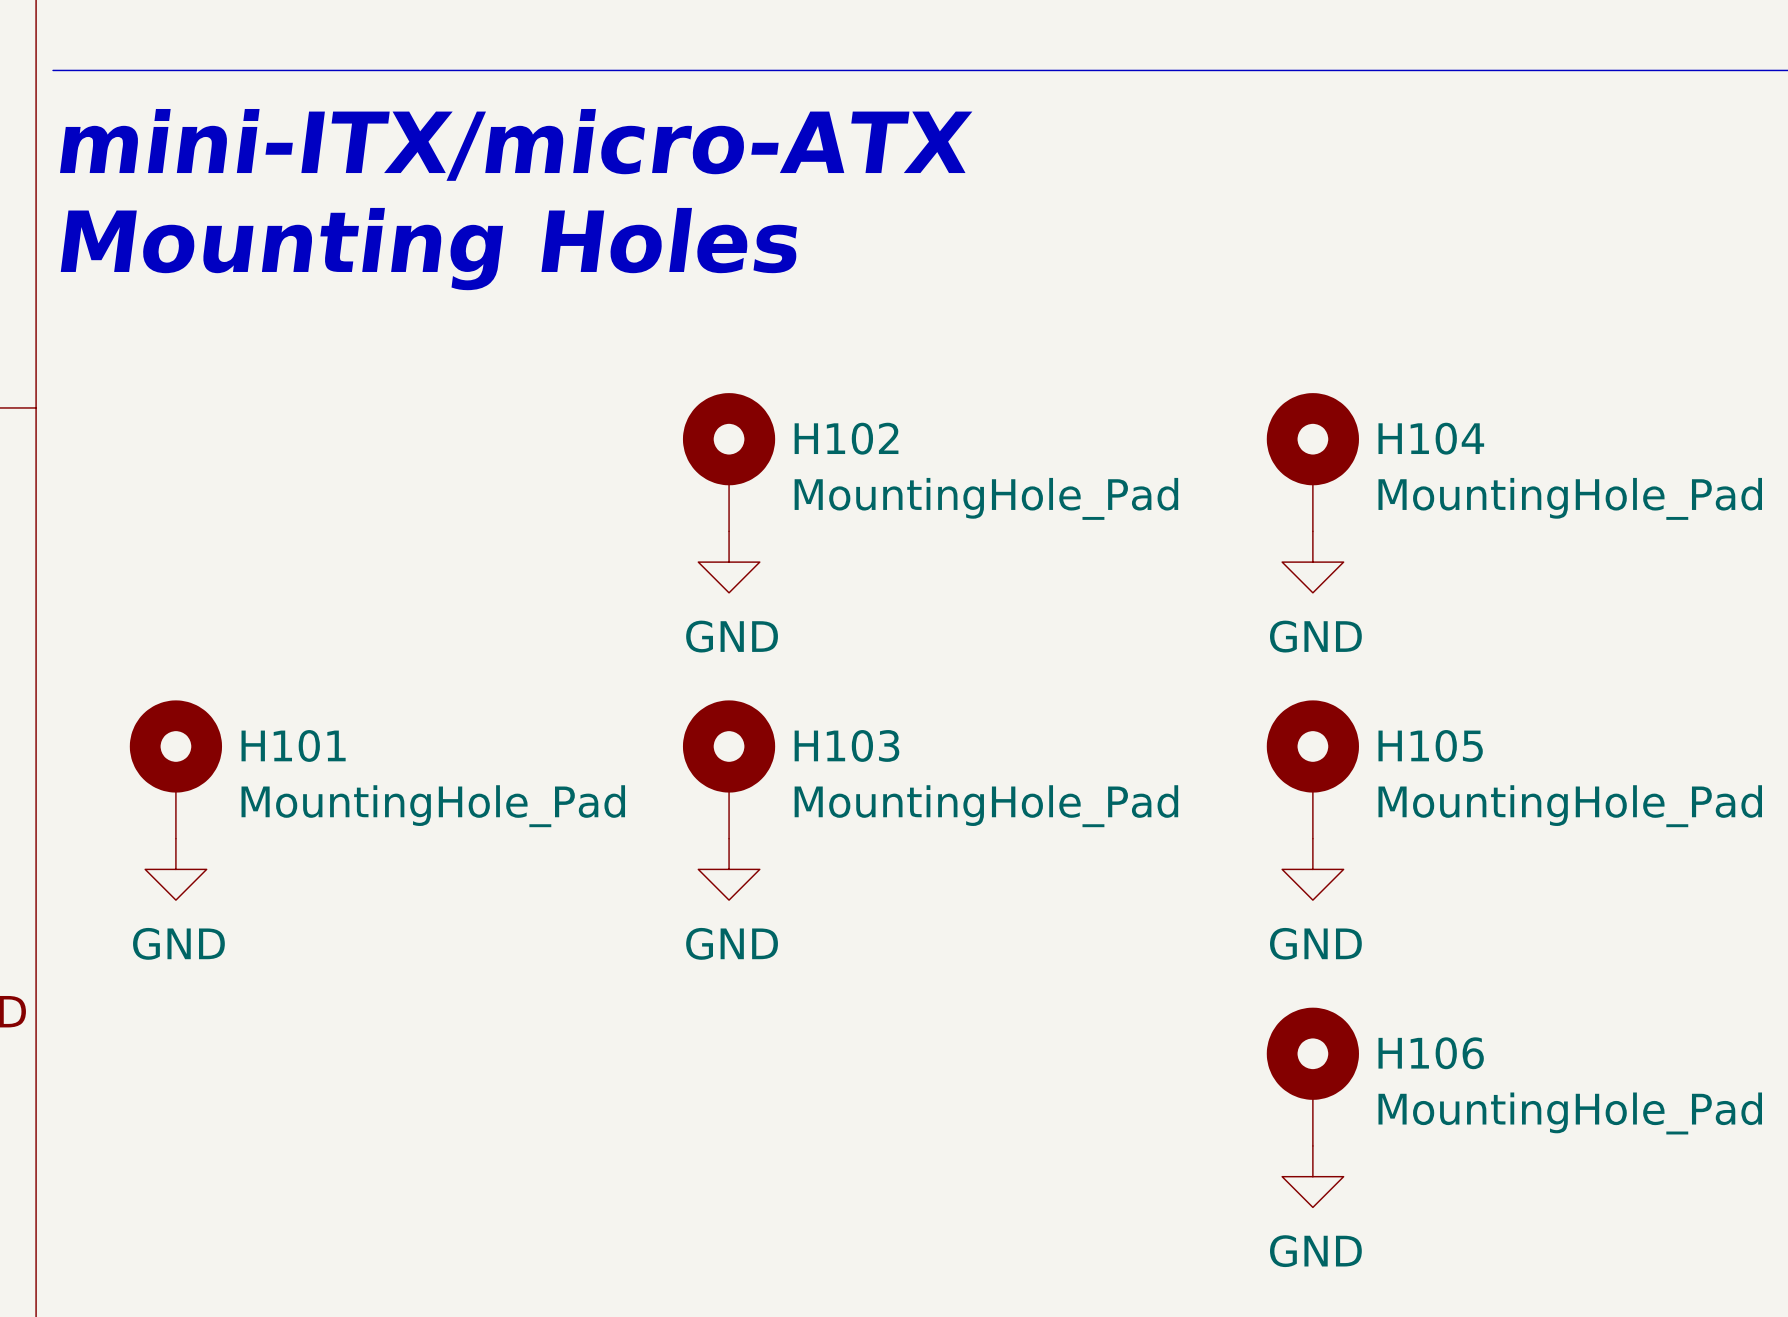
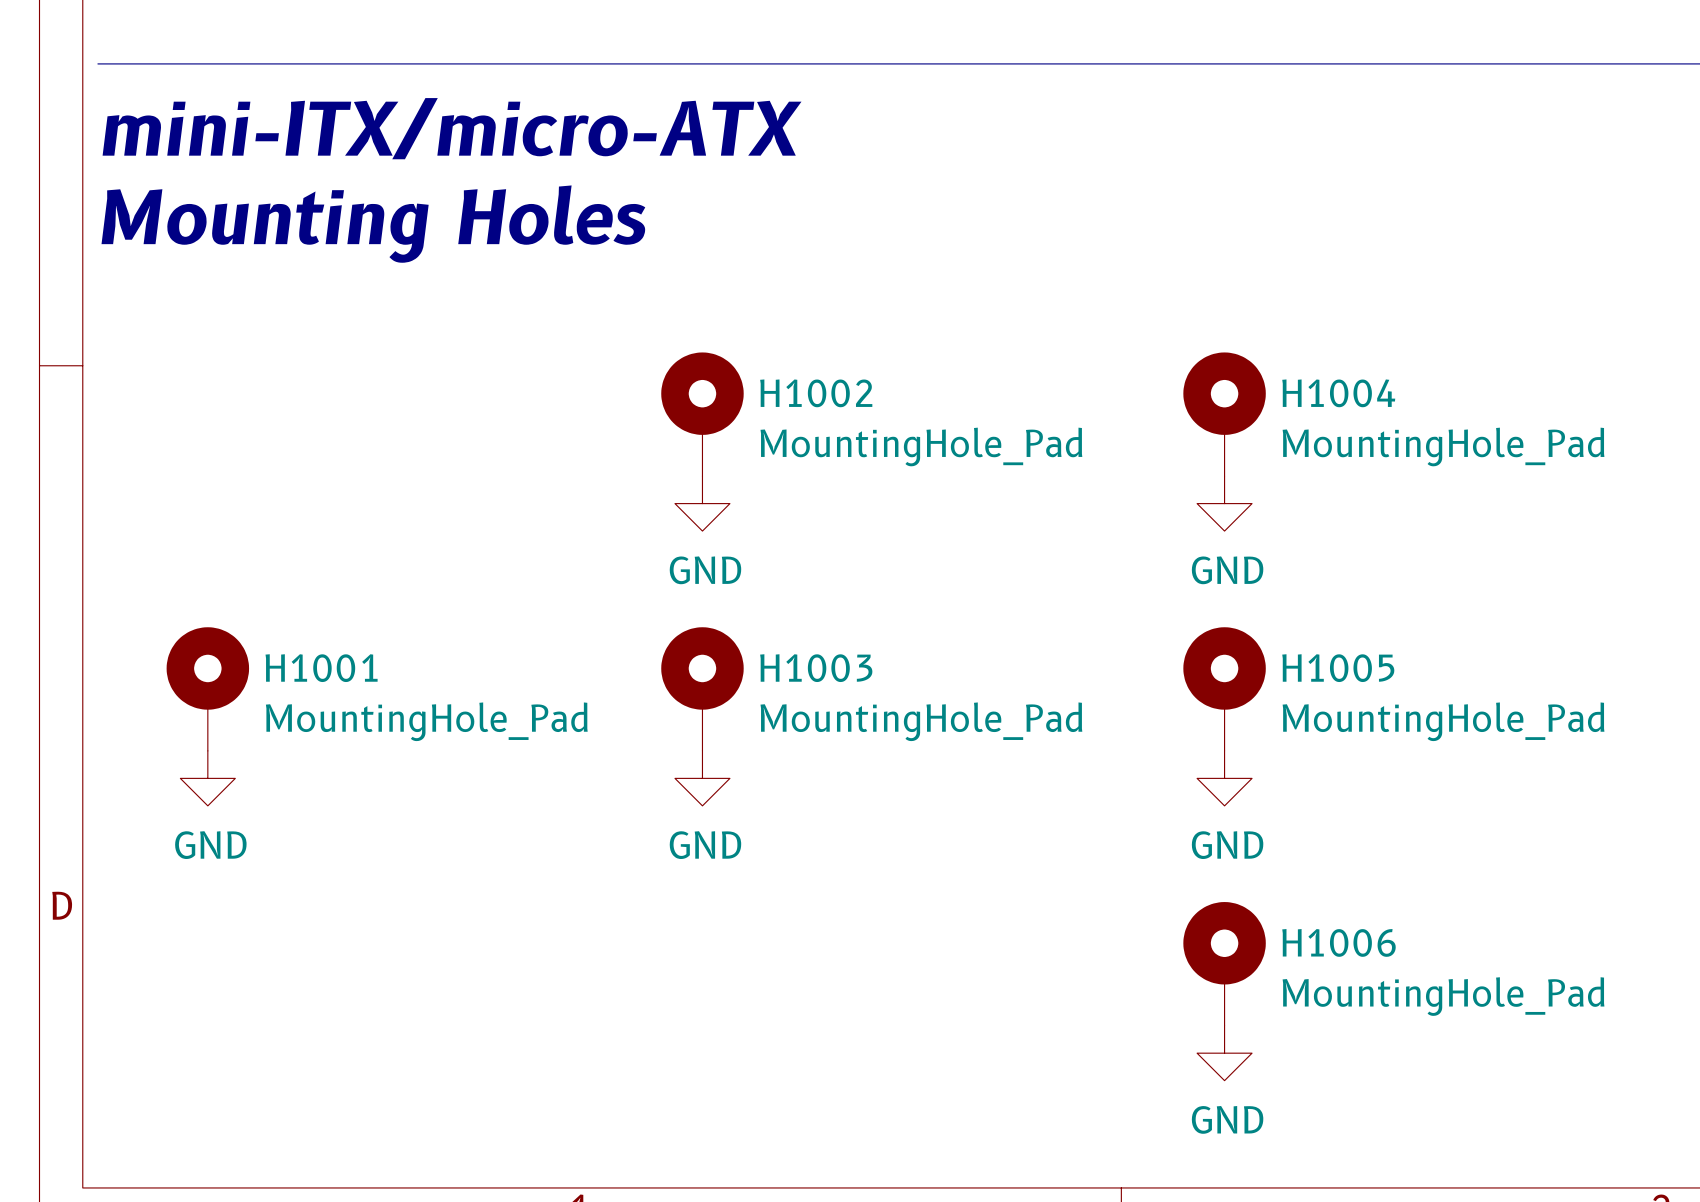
H102 name: H102 (846, 438) -> H1002 (816, 393)
H104 name: H104 (1431, 438) -> H1004 (1338, 393)
H101 name: H101 (293, 745) -> H1001 (321, 668)
H103 name: H103 (846, 745) -> H1003 (816, 668)
H105 name: H105 (1430, 745) -> H1005 (1338, 668)
H106 name: H106 (1431, 1053) -> H1006 (1338, 942)

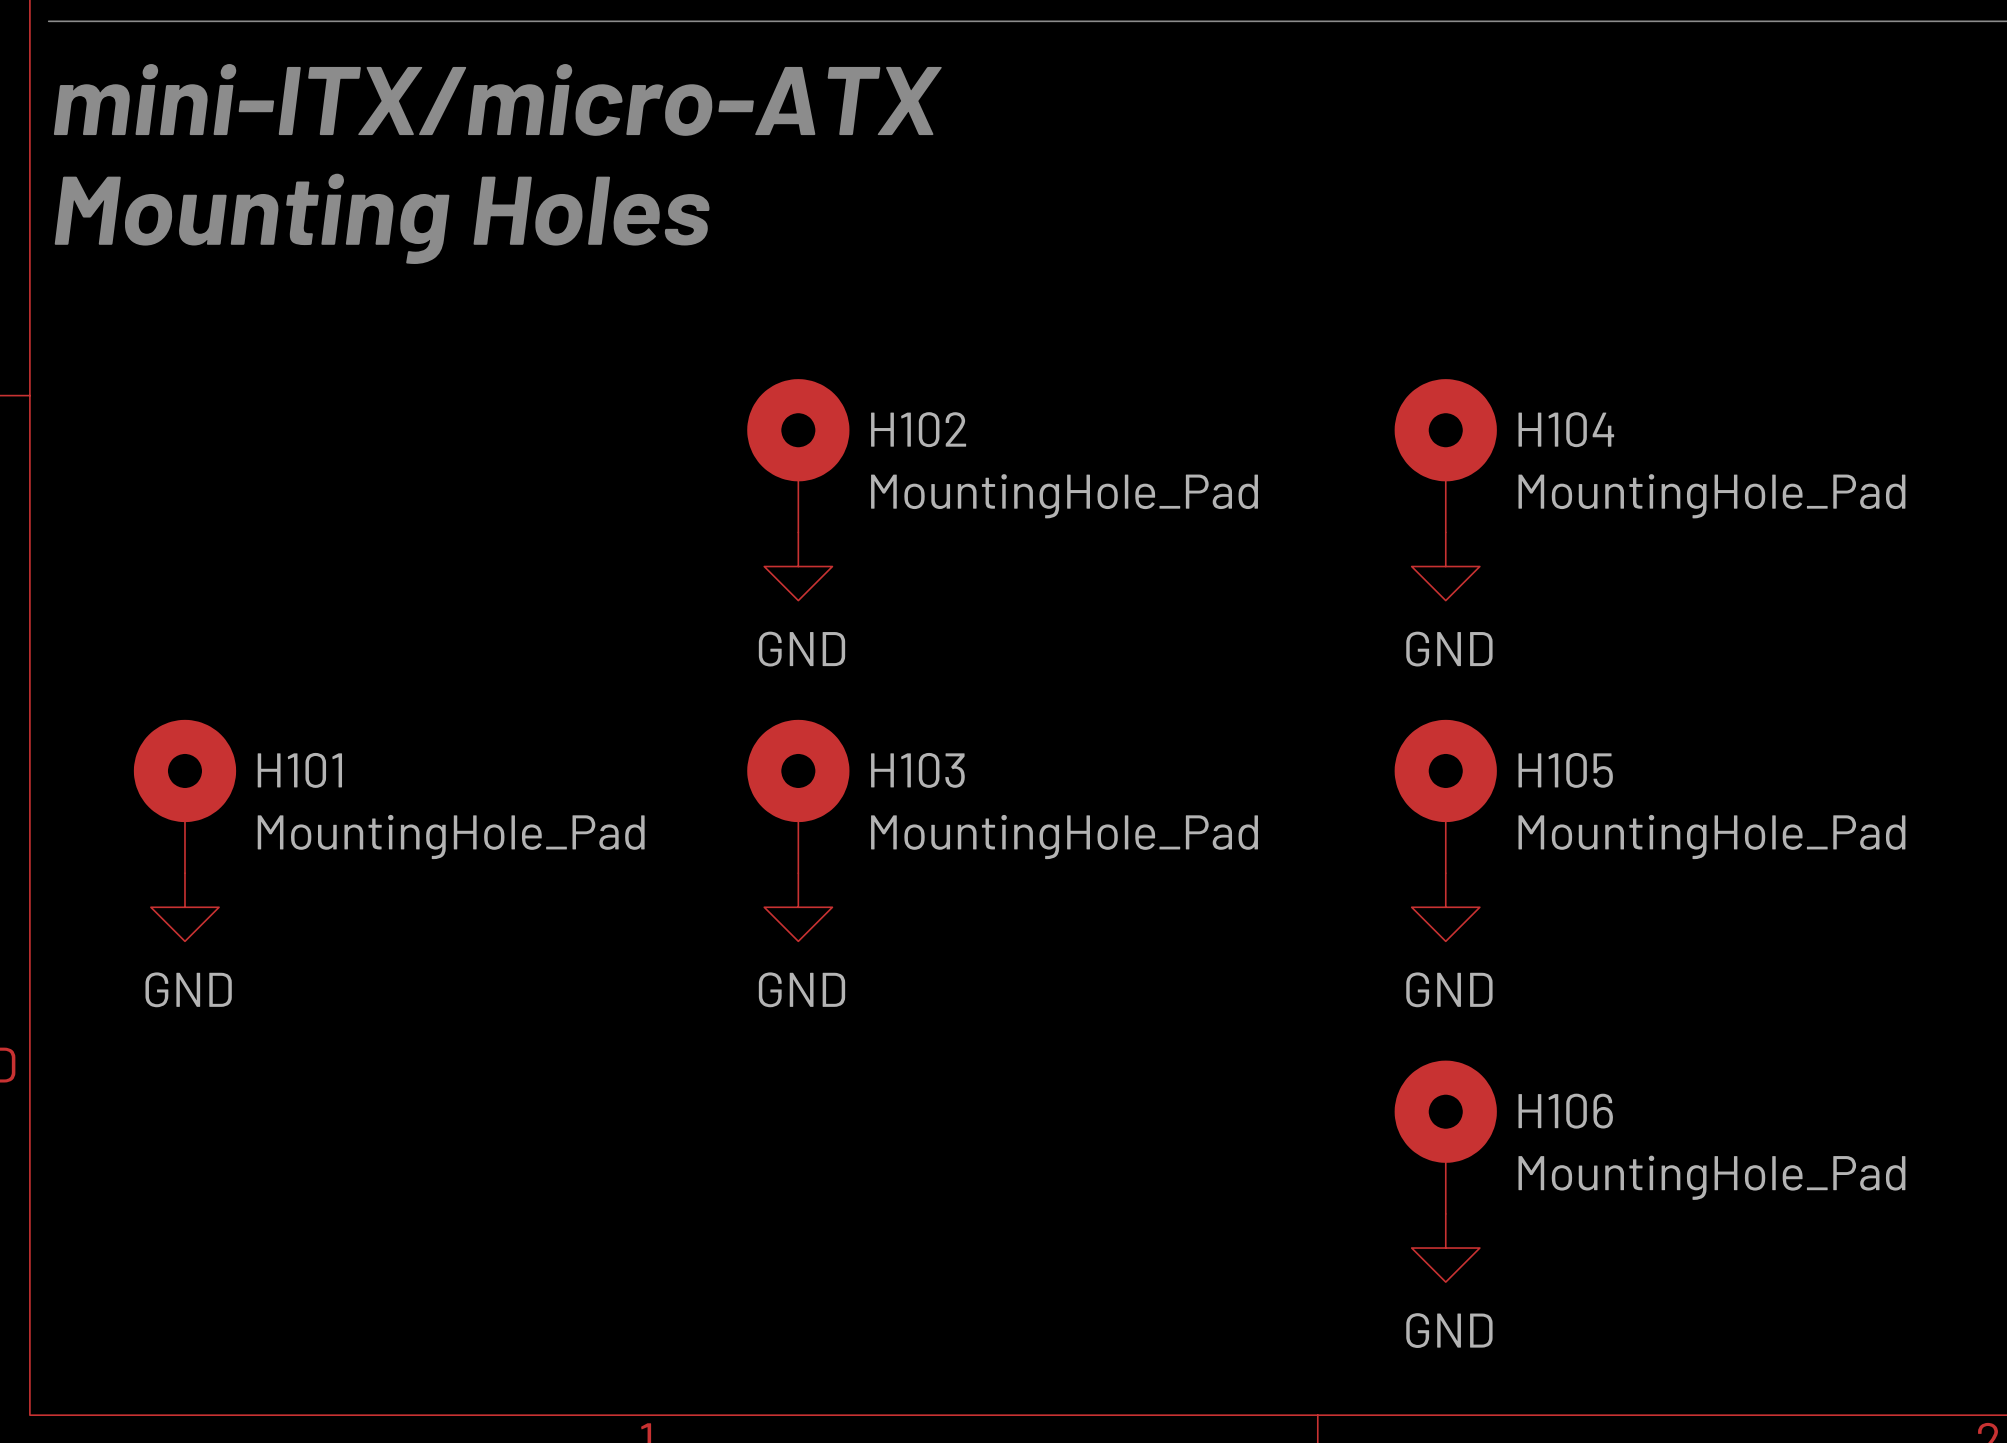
H1002 name: H1002 (816, 393) -> H102 (918, 429)
H1004 name: H1004 (1338, 393) -> H104 (1566, 429)
H1001 name: H1001 (321, 668) -> H101 (299, 770)
H1003 name: H1003 (816, 668) -> H103 (917, 770)
H1005 name: H1005 (1338, 668) -> H105 (1565, 770)
H1006 name: H1006 (1338, 942) -> H106 (1565, 1111)

